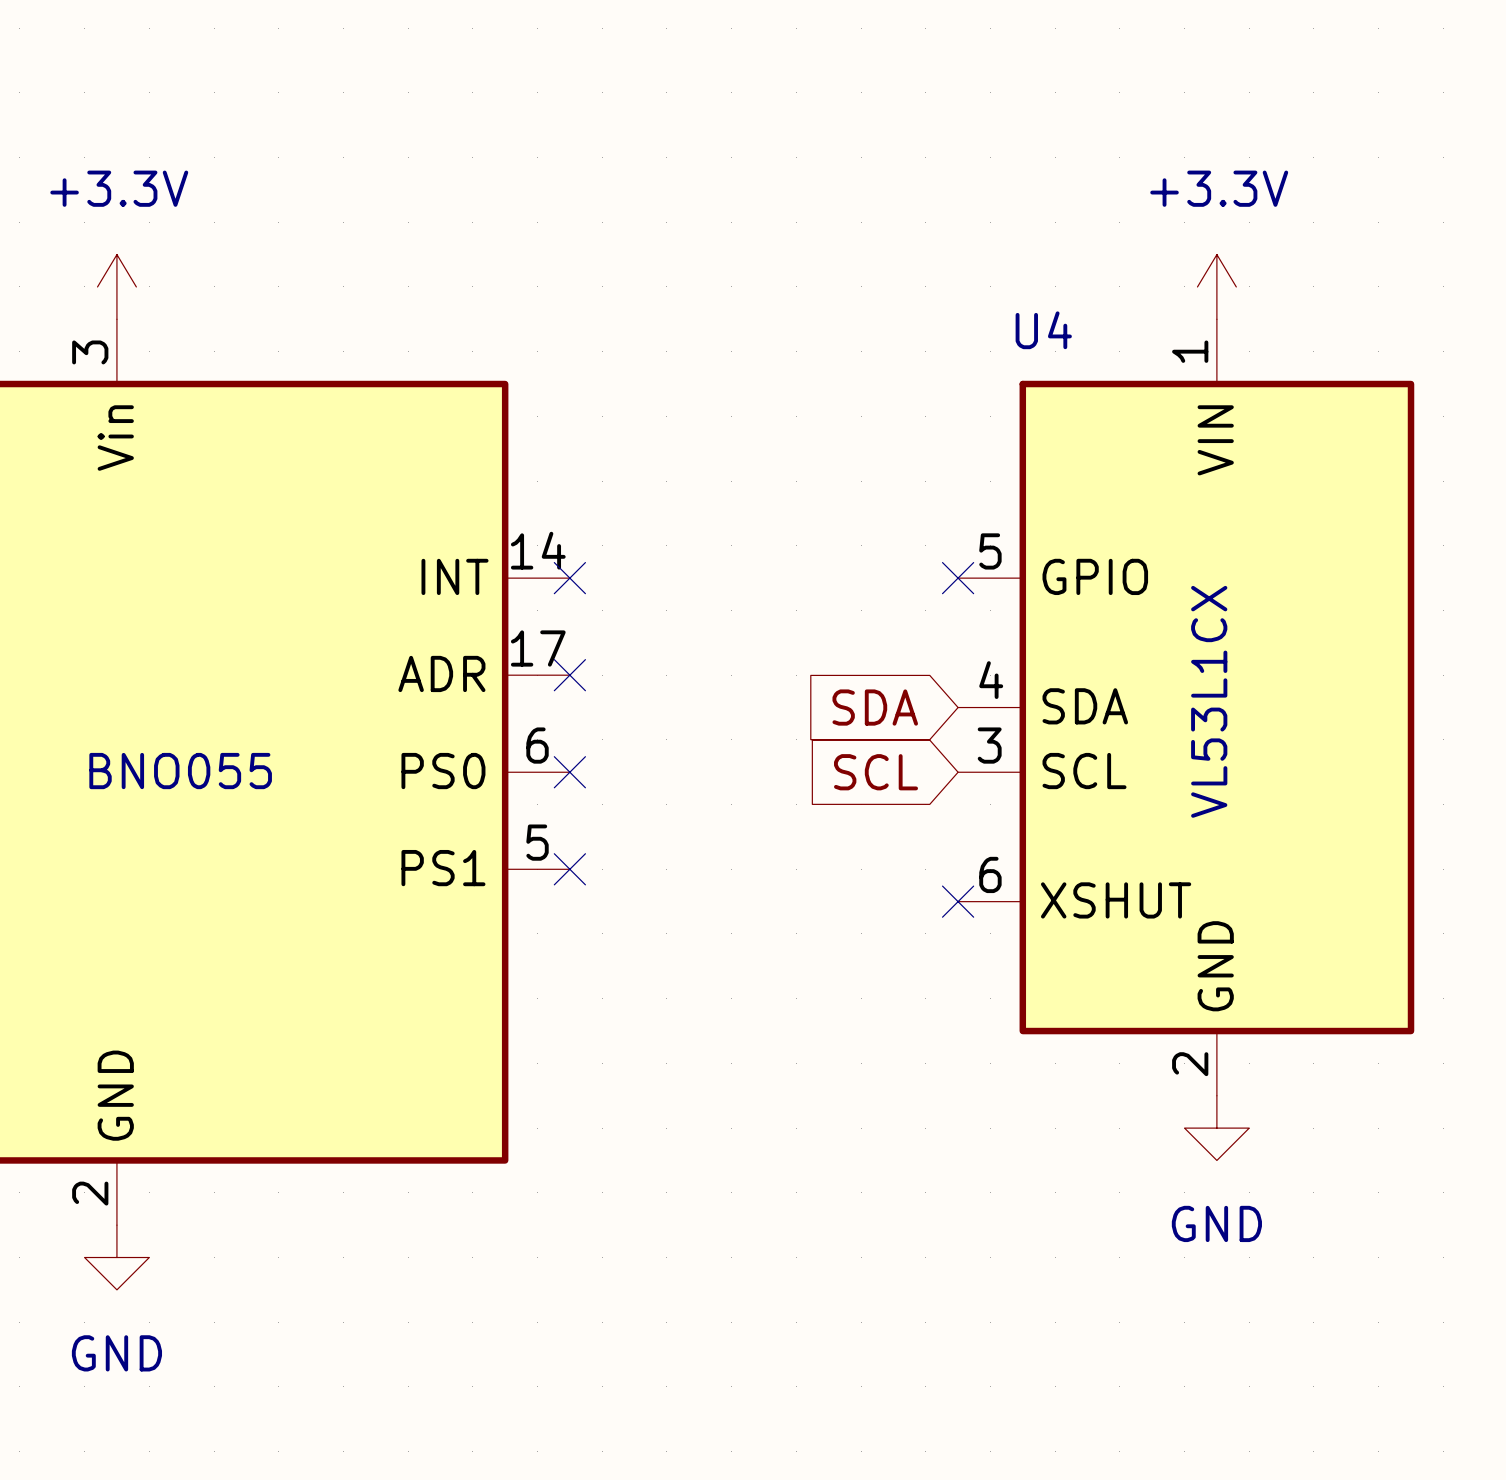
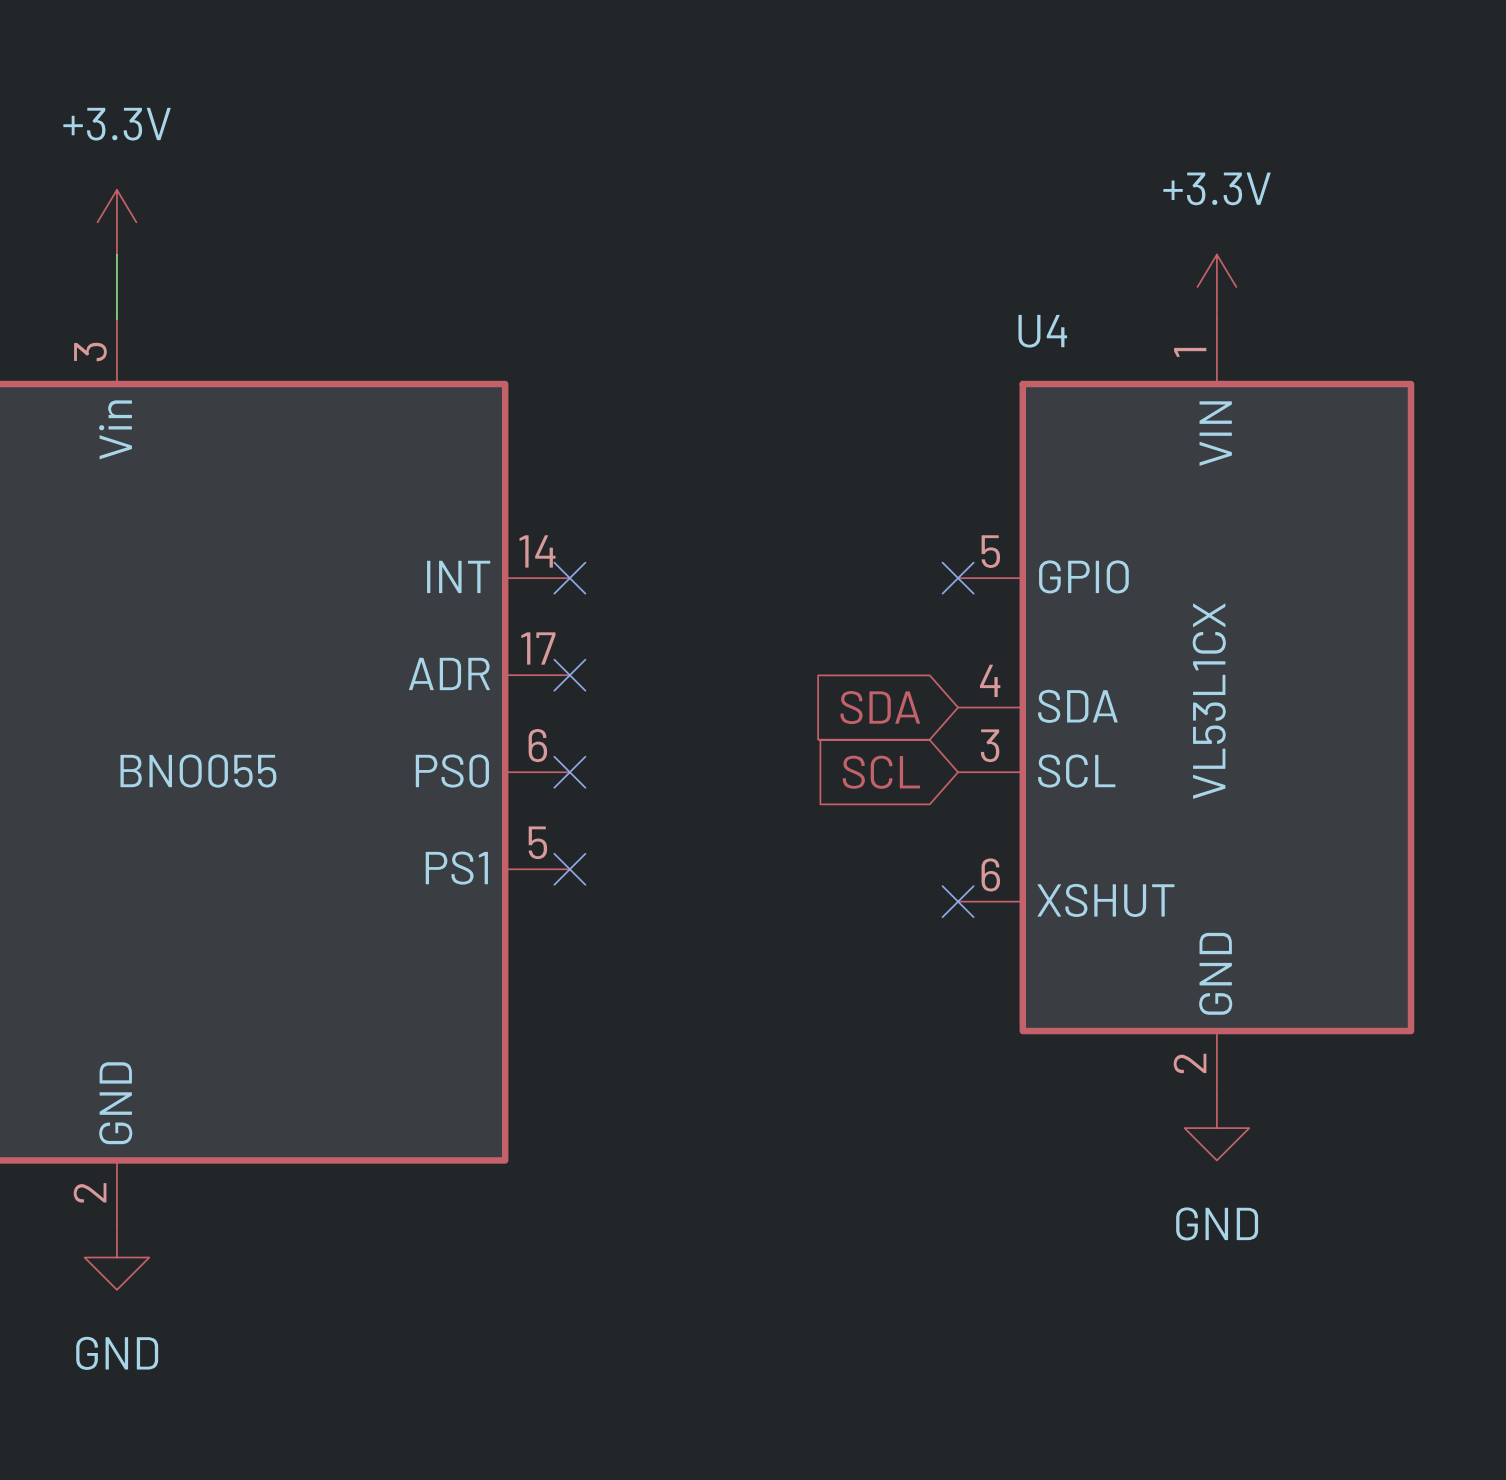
power symbol position: +3.3V (116, 286) -> +3.3V (116, 222)

